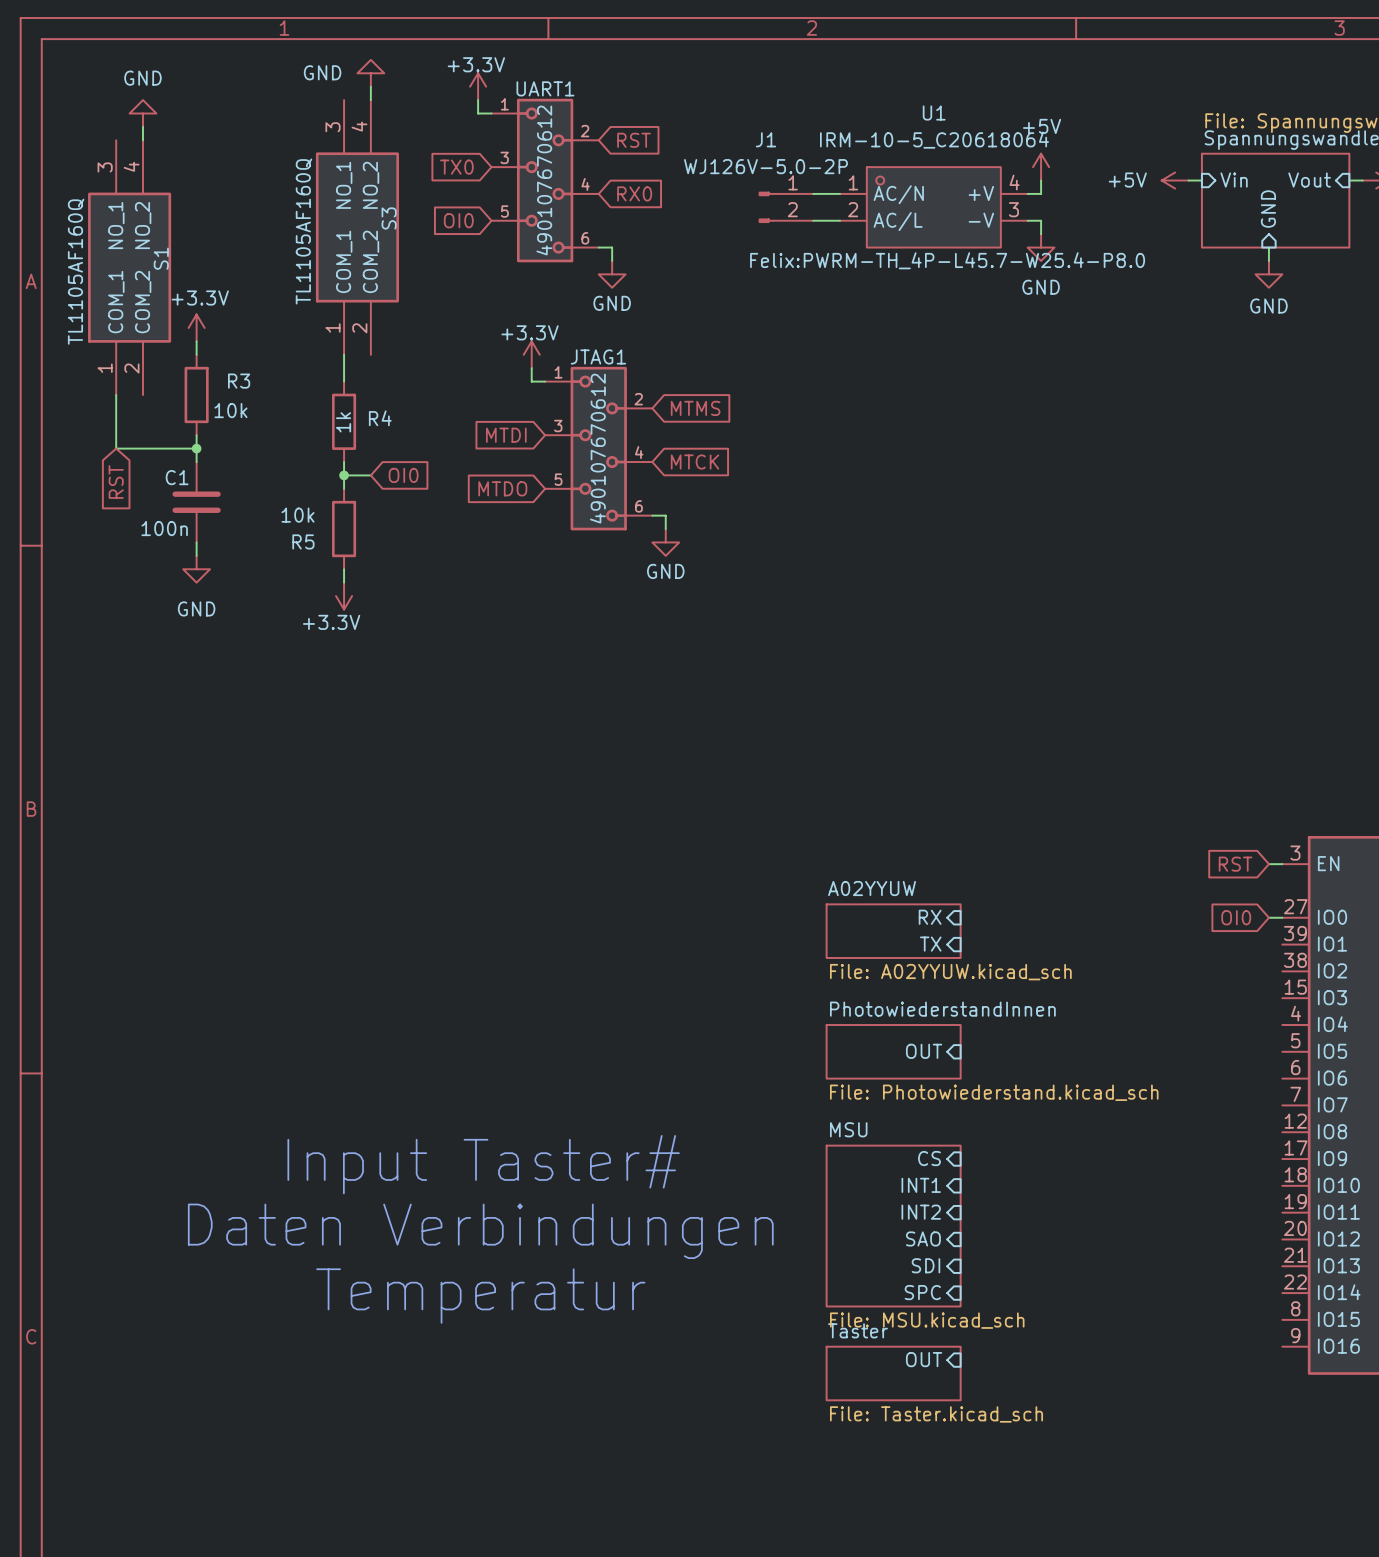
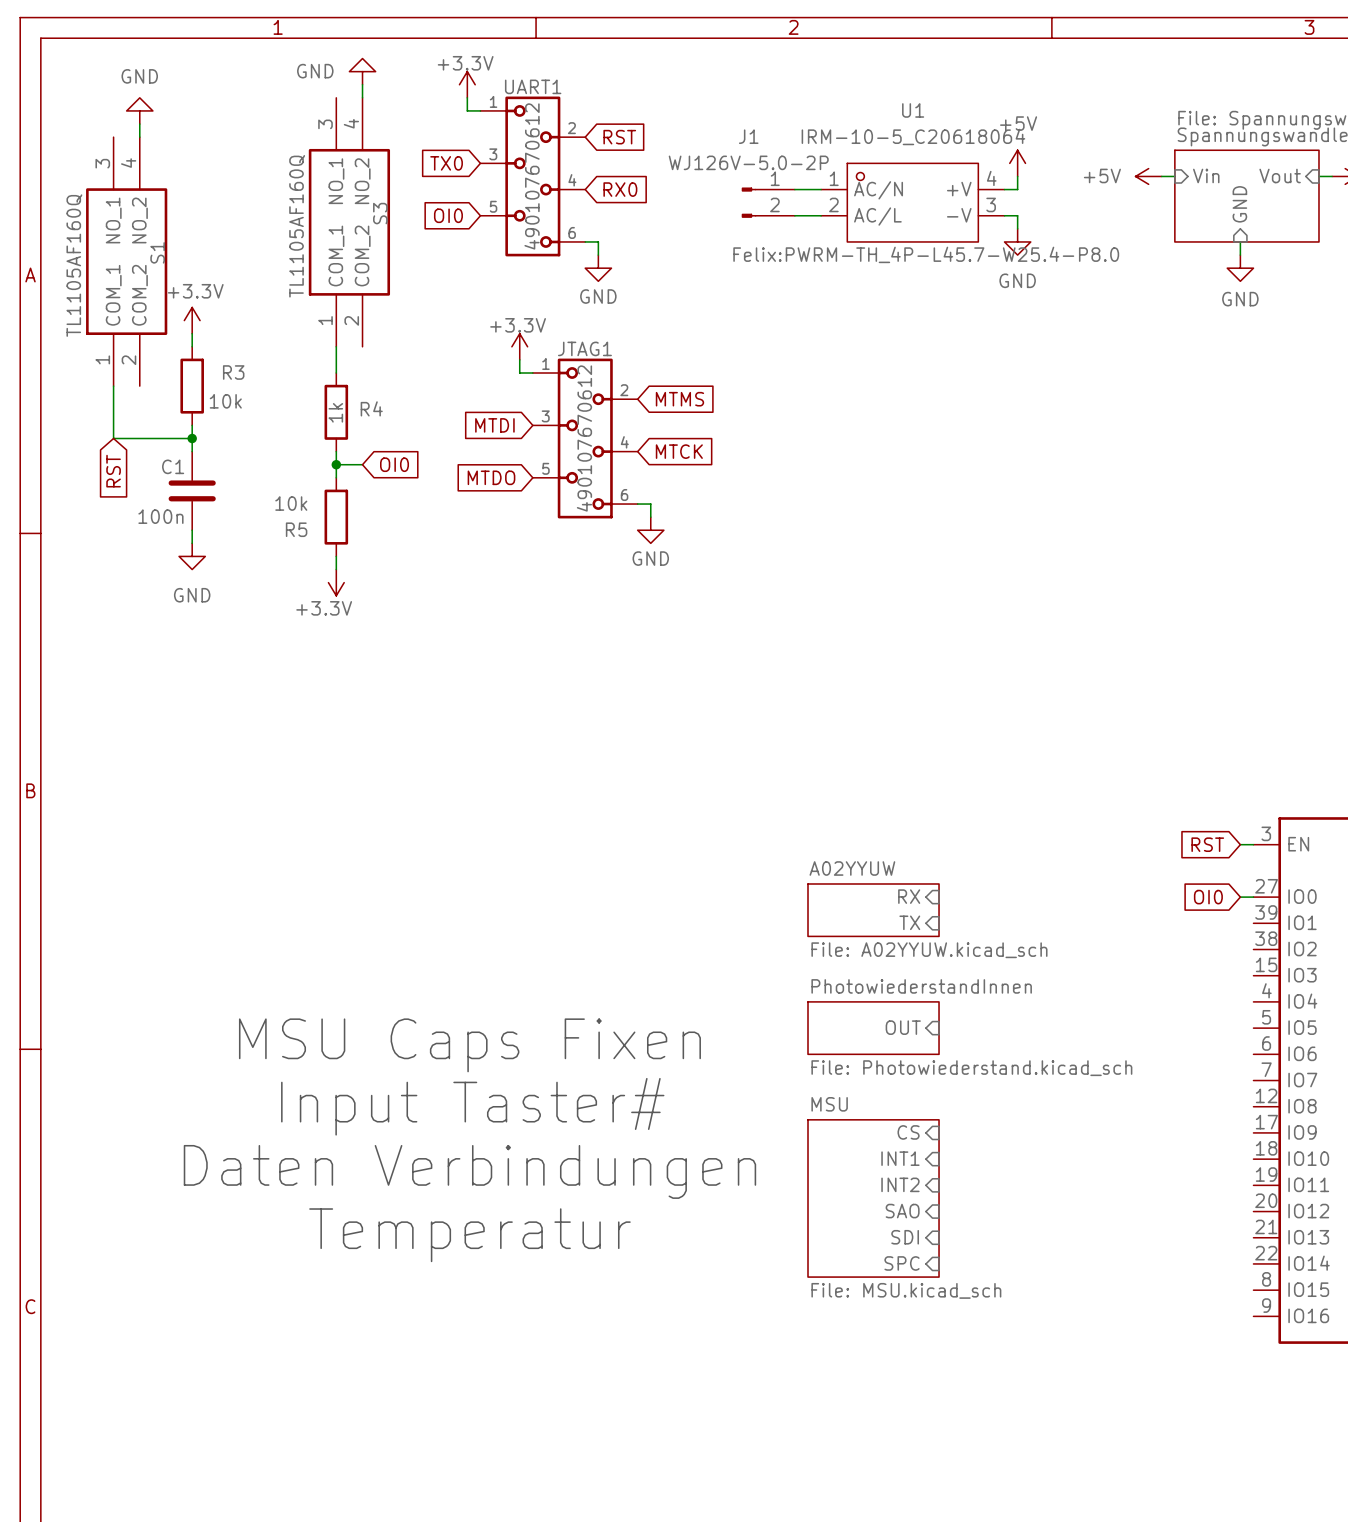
text: none -> MSU Caps Fixen (469, 1045)
text position: Input Taster# (483, 1164) -> Input Taster# (472, 1106)
text position: Daten Verbindungen (480, 1231) -> Daten Verbindungen (469, 1171)
text position: Temperatur (480, 1296) -> Temperatur (469, 1235)
sheet pin: OUT (924, 1359) -> none
sheet Taster: File: Taster.kicad_sch (893, 1373) -> none

